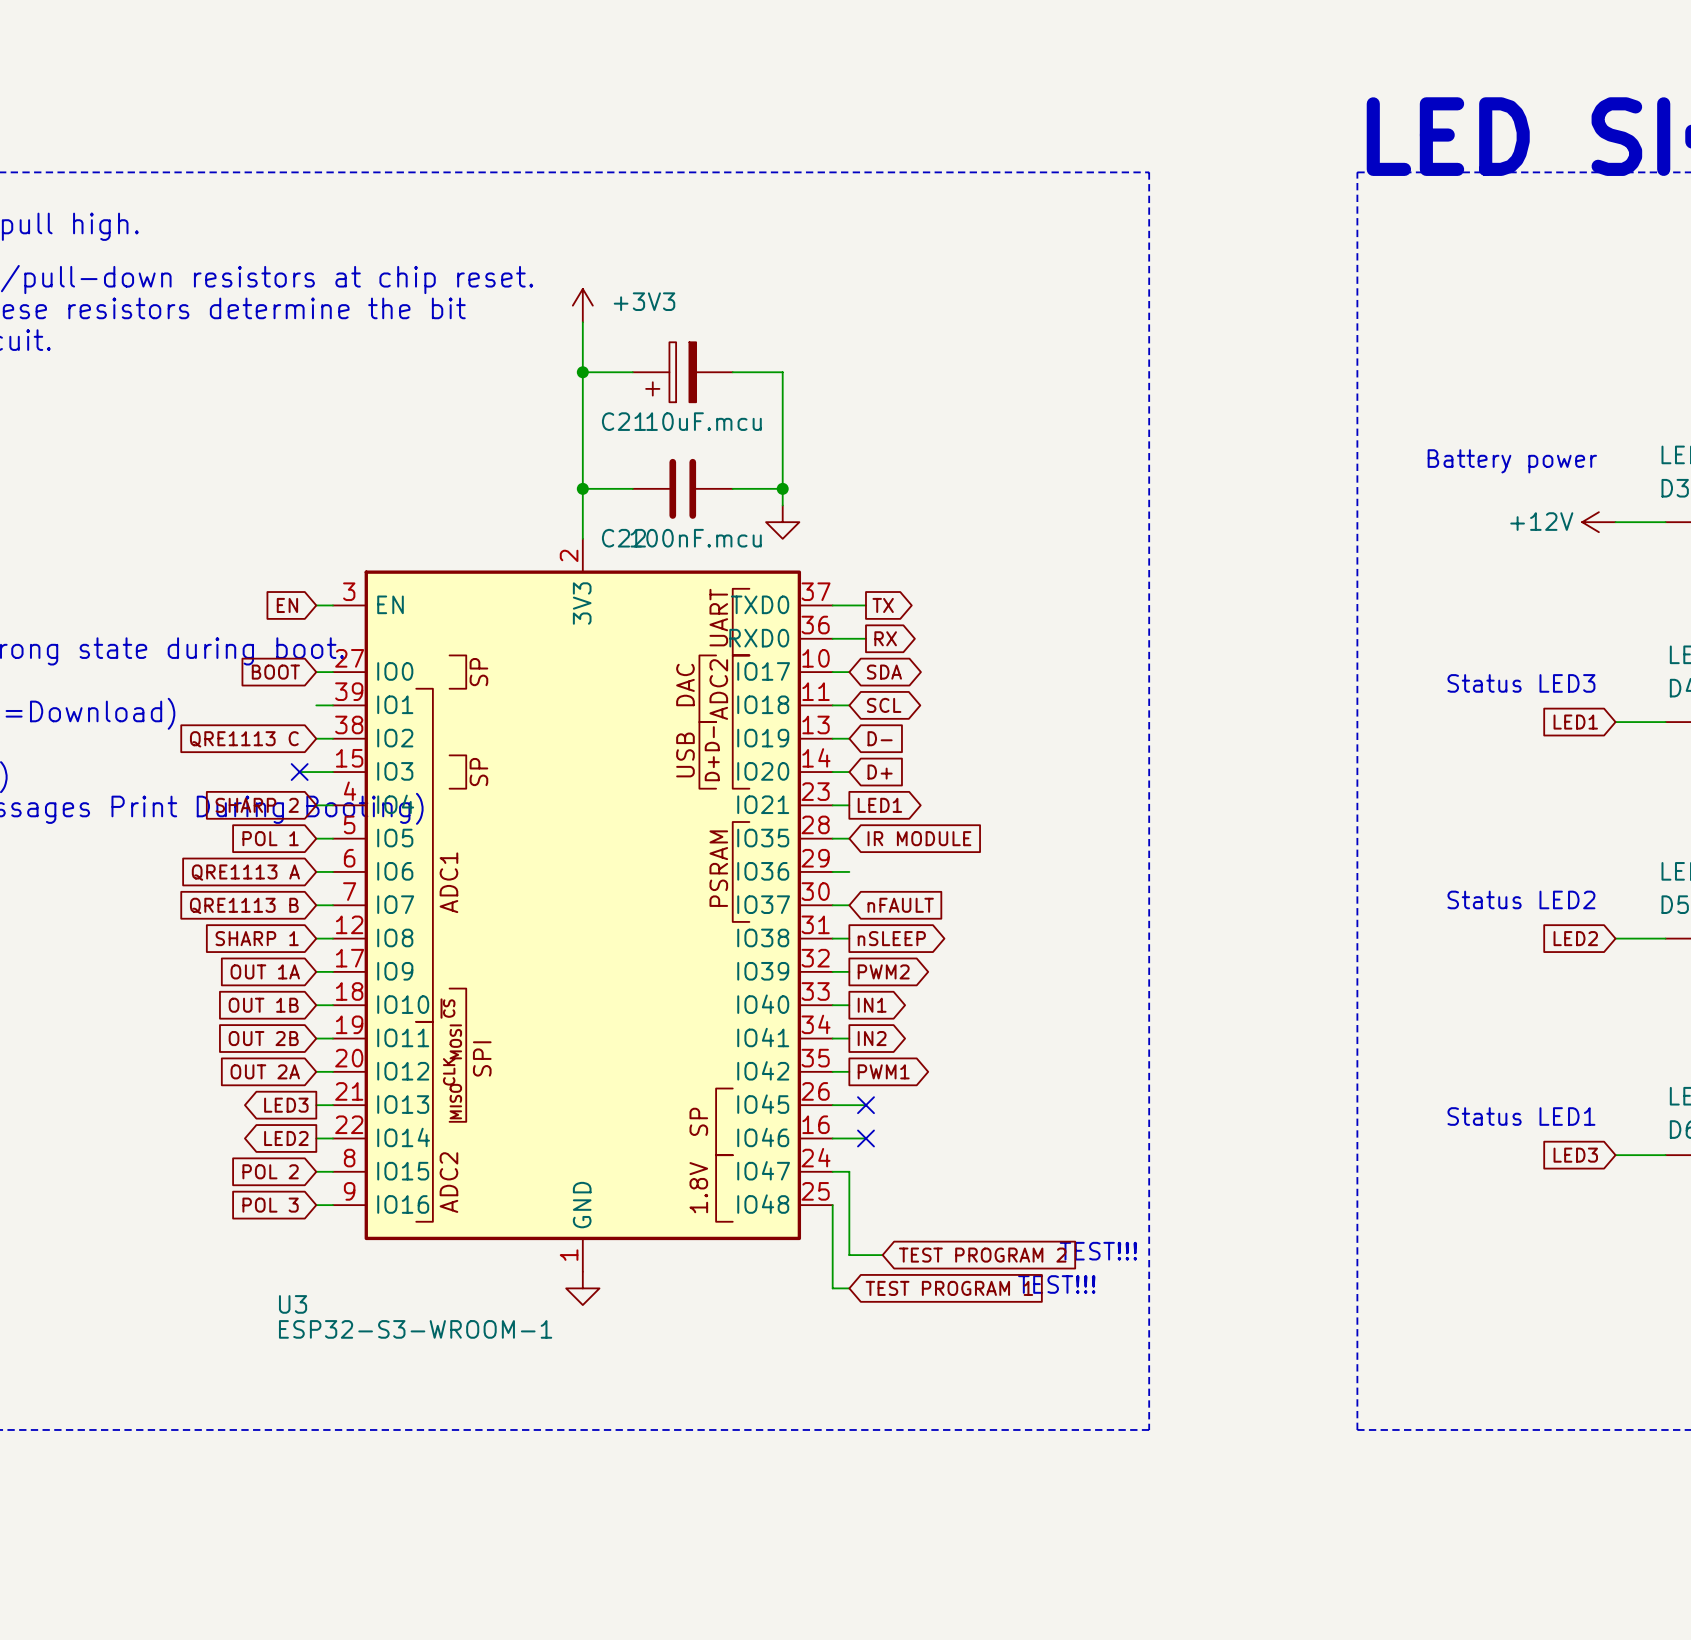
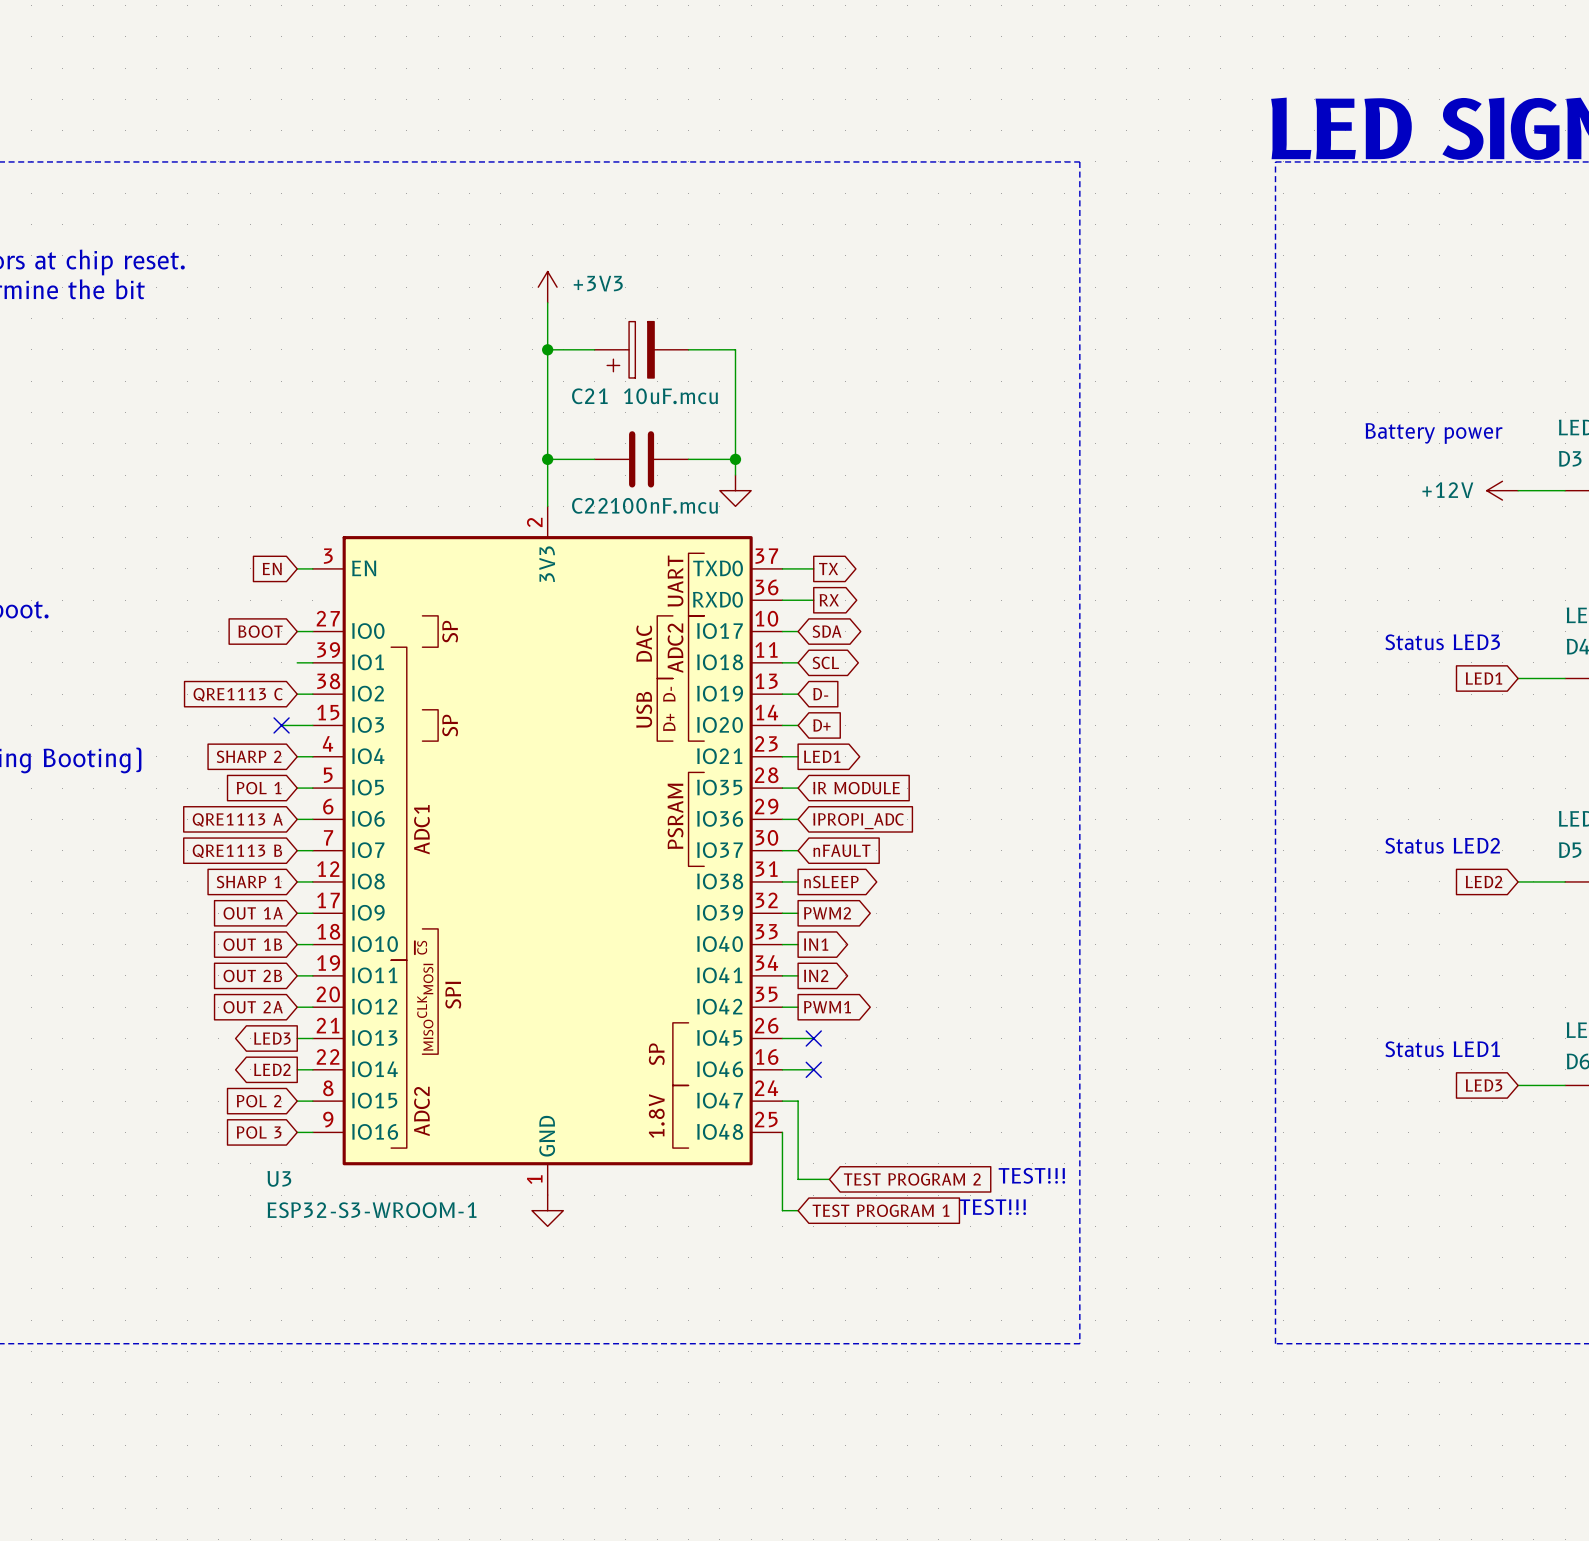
global label: none -> IPROPI_ADC (858, 821)
U3 name position: U3 (293, 1304) -> U3 (279, 1178)
U3 value position: ESP32-S3-WROOM-1 (415, 1329) -> ESP32-S3-WROOM-1 (372, 1210)

